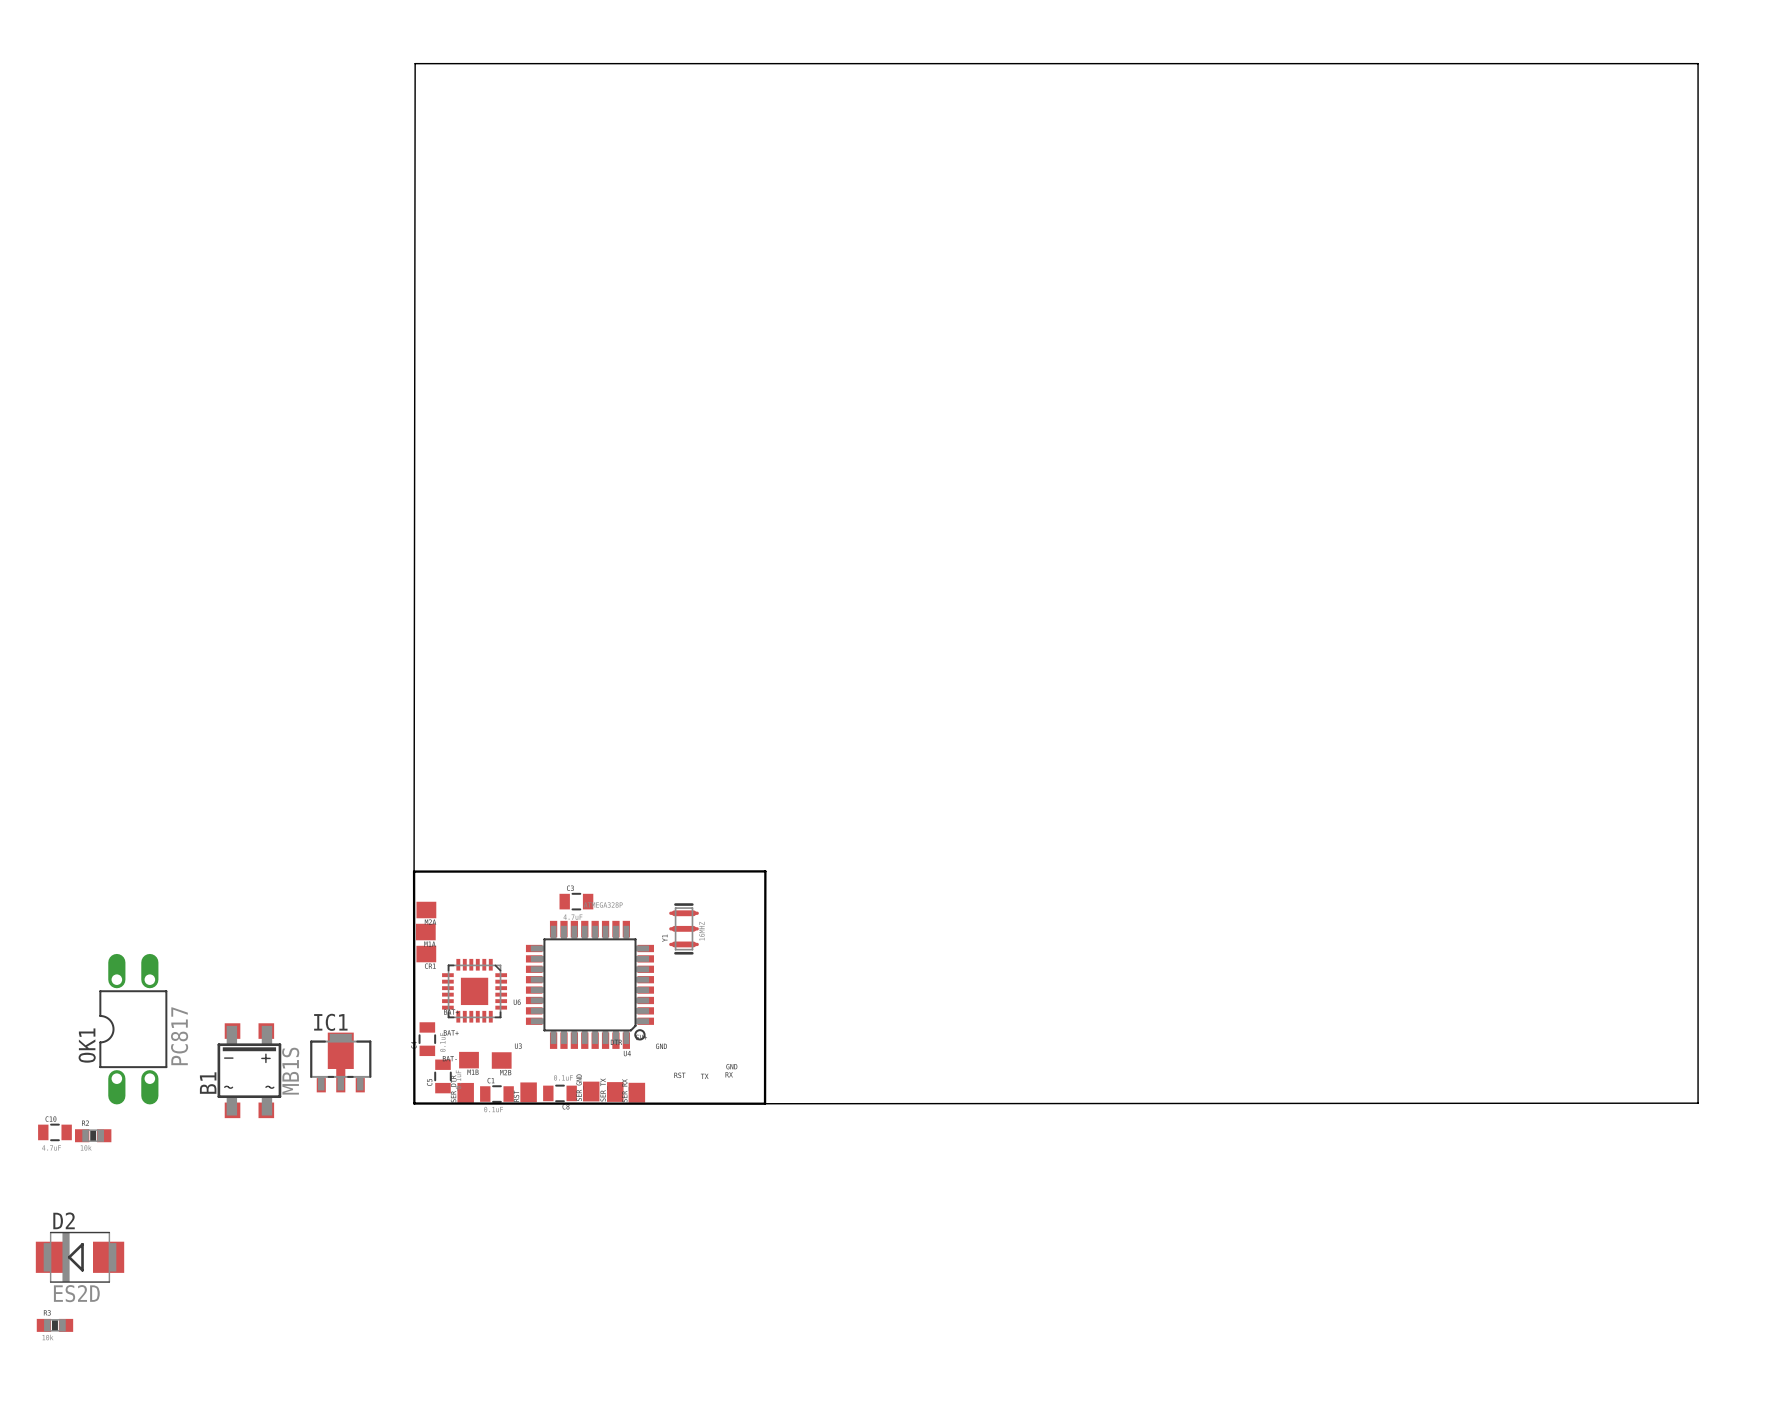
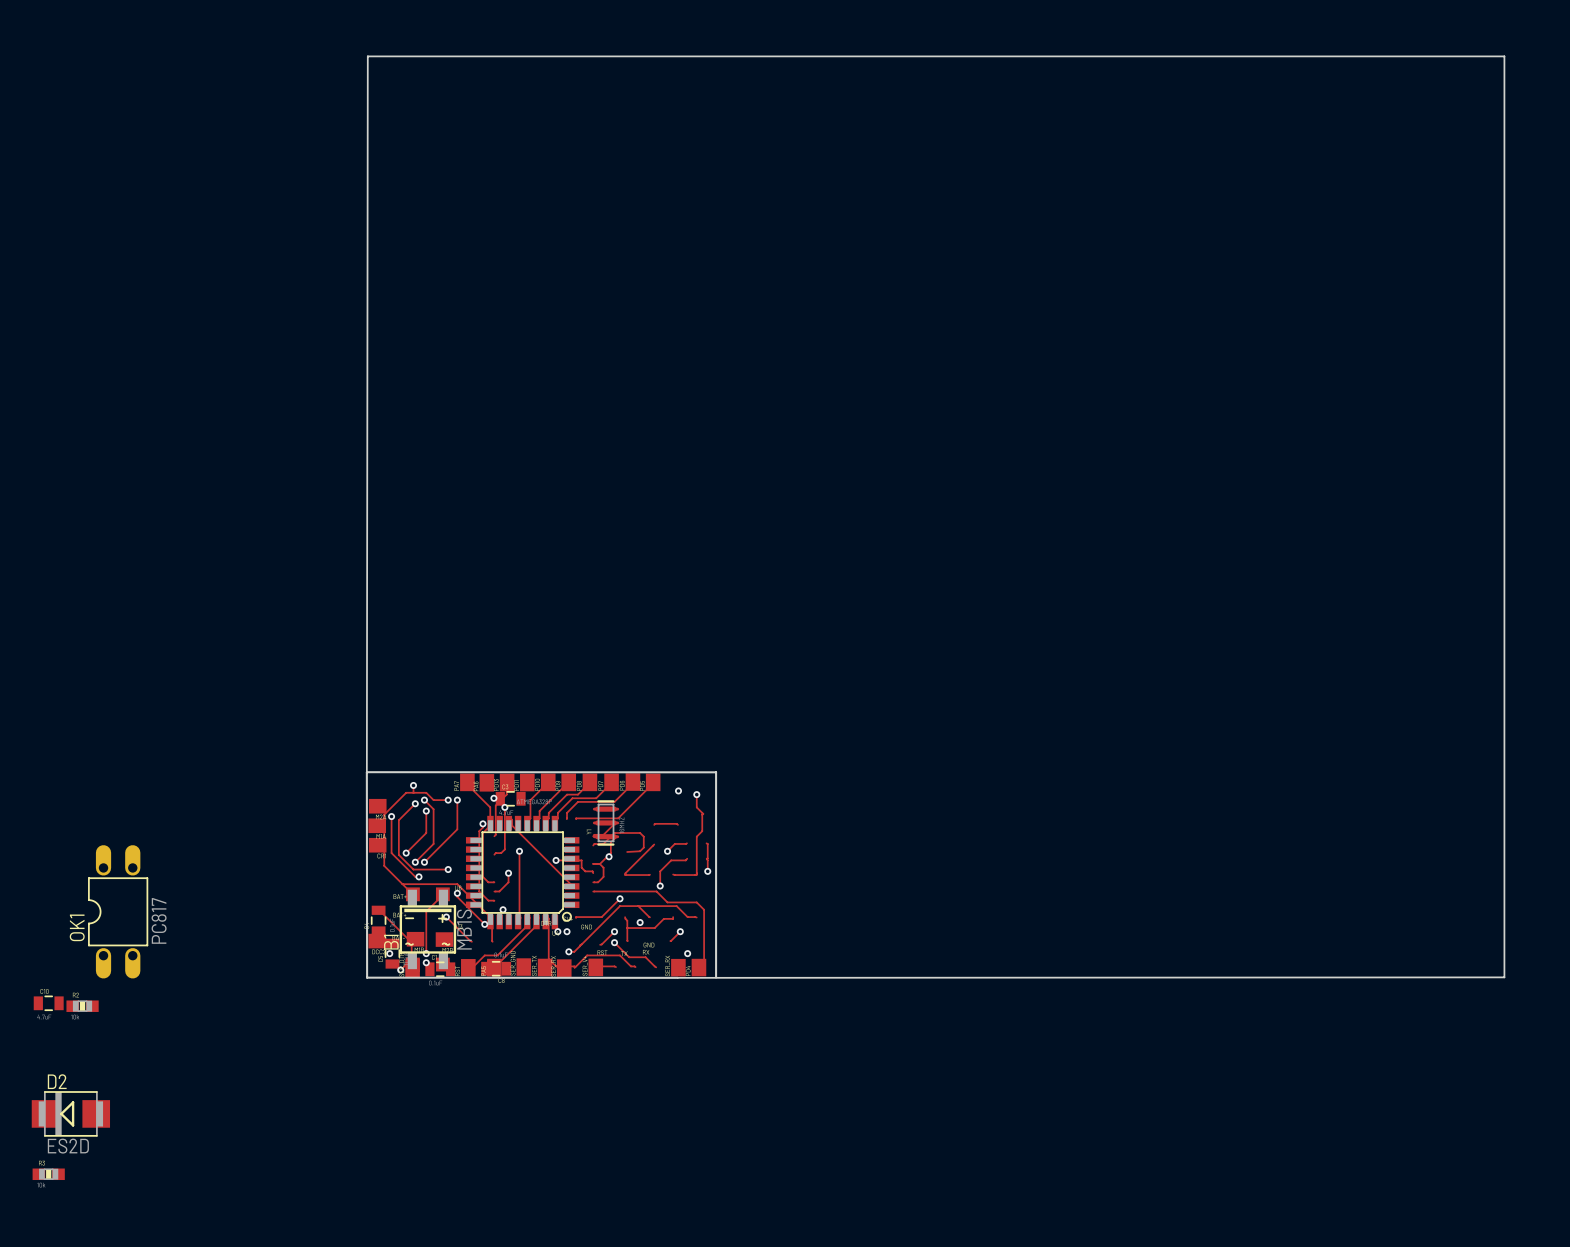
board edge: (765, 871) (765, 1103) -> (678, 772) (716, 772) (716, 977)
track: none -> (632, 782) (614, 801) (577, 801) (567, 812) (566, 819)
part: none -> (632, 782)
track: none -> (467, 782) (466, 783) (490, 807) (490, 825) (482, 832) (482, 876) (488, 882) (494, 882)
part: none -> (467, 782)
part: none -> (486, 782)
track: none -> (507, 782) (506, 794) (495, 805) (494, 836)
part: none -> (507, 782)
part: none -> (527, 782)
track: none -> (548, 782) (530, 800) (530, 819)
part: none -> (548, 782)
track: none -> (568, 782) (539, 811) (539, 819)
part: none -> (568, 782)
track: none -> (589, 782) (577, 794) (567, 794) (548, 812) (548, 819)
part: none -> (589, 782)
track: none -> (611, 782) (596, 798) (572, 798) (557, 812) (557, 819)
part: none -> (611, 782)
track: none -> (653, 782) (618, 818) (576, 819)
part: none -> (653, 782)
track: none -> (413, 785) (413, 792)
via: none -> (413, 785)
via: none -> (678, 790)
track: none -> (696, 794) (696, 807) (703, 813) (702, 831) (696, 836) (696, 874) (673, 874)
via: none -> (696, 794)
via: none -> (493, 798)
track: none -> (424, 800) (433, 809) (433, 843) (415, 862)
via: none -> (424, 800)
track: none -> (448, 800) (433, 800) (426, 792) (406, 792) (384, 814) (384, 865) (412, 894)
via: none -> (448, 800)
track: none -> (457, 800) (457, 829) (424, 862)
via: none -> (457, 800)
track: none -> (415, 803) (398, 820) (398, 854) (413, 869) (448, 869)
via: none -> (415, 803)
track: none -> (504, 807) (504, 849) (501, 853) (494, 854)
via: none -> (504, 807)
track: none -> (426, 811) (426, 832) (406, 853)
via: none -> (426, 811)
track: none -> (391, 816) (391, 853) (415, 876) (418, 876)
via: none -> (391, 816)
track: none -> (511, 819) (512, 825) (570, 884)
track: none -> (482, 823) (482, 827) (479, 831) (479, 891) (488, 900) (494, 900)
via: none -> (482, 823)
track: none -> (615, 824) (603, 834) (593, 836)
track: none -> (678, 824) (654, 824)
track: none -> (615, 838) (610, 842) (610, 853) (599, 864)
track: none -> (686, 843) (674, 843) (667, 851)
track: none -> (706, 843) (707, 871)
track: none -> (654, 844) (625, 874) (649, 874)
track: none -> (593, 845) (603, 843) (614, 832) (640, 832) (643, 836) (643, 847) (640, 851) (627, 851)
track: none -> (519, 851) (520, 917)
via: none -> (519, 851)
via: none -> (667, 851)
via: none -> (406, 853)
via: none -> (609, 856)
track: none -> (687, 858) (685, 860) (671, 860) (660, 871) (660, 885)
track: none -> (556, 860) (581, 860) (581, 867) (585, 871) (592, 871) (593, 873)
via: none -> (556, 860)
via: none -> (415, 862)
via: none -> (424, 862)
track: none -> (599, 864) (603, 867) (603, 876) (598, 882) (593, 882)
track: none -> (599, 864) (594, 864) (593, 863) (599, 864)
via: none -> (448, 869)
via: none -> (707, 871)
track: none -> (508, 873) (508, 882) (499, 891) (494, 891)
via: none -> (508, 873)
via: none -> (418, 876)
part: (474, 990) -> none
track: none -> (402, 884) (457, 884) (492, 918) (492, 941)
via: none -> (660, 885)
track: none -> (593, 891) (656, 891) (667, 902) (696, 902) (704, 909) (704, 962) (698, 967)
track: none -> (457, 893) (457, 896) (484, 924)
via: none -> (457, 893)
track: none -> (442, 894) (426, 911) (426, 953)
track: none -> (620, 898) (601, 917) (576, 917)
via: none -> (620, 898)
track: none -> (638, 906) (649, 917)
track: none -> (377, 908) (411, 942) (412, 964) (411, 959) (400, 970)
via: none -> (503, 909)
track: none -> (446, 917) (471, 941)
via: none -> (446, 917)
track: none -> (625, 917) (627, 920) (627, 941)
track: none -> (673, 917) (673, 918) (663, 918) (654, 928) (627, 928)
track: none -> (696, 917) (687, 917) (676, 906) (620, 906) (574, 951) (568, 951)
track: none -> (530, 917) (528, 924) (497, 955) (484, 955) (473, 967)
track: none -> (539, 917) (537, 924) (494, 967)
track: none -> (548, 917) (548, 959) (556, 966)
via: none -> (640, 922)
via: none -> (484, 924)
via: none -> (557, 931)
via: none -> (567, 931)
track: none -> (614, 931) (600, 944)
via: none -> (614, 931)
track: none -> (680, 931) (670, 941)
via: none -> (680, 931)
IC1: (340, 1062) -> none
part: none -> (377, 941)
track: none -> (614, 942) (629, 957) (645, 957) (656, 967)
via: none -> (614, 942)
B1 position: (249, 1070) -> (427, 929)
via: none -> (568, 951)
via: none -> (389, 953)
via: none -> (426, 953)
via: none -> (687, 953)
via: none -> (426, 962)
track: none -> (556, 966) (574, 967) (587, 955) (620, 955) (630, 966) (635, 967)
part: none -> (595, 967)
track: none -> (616, 967) (595, 967)
part: none -> (494, 967)
part: none -> (678, 967)
part: none -> (698, 967)
via: none -> (400, 970)

